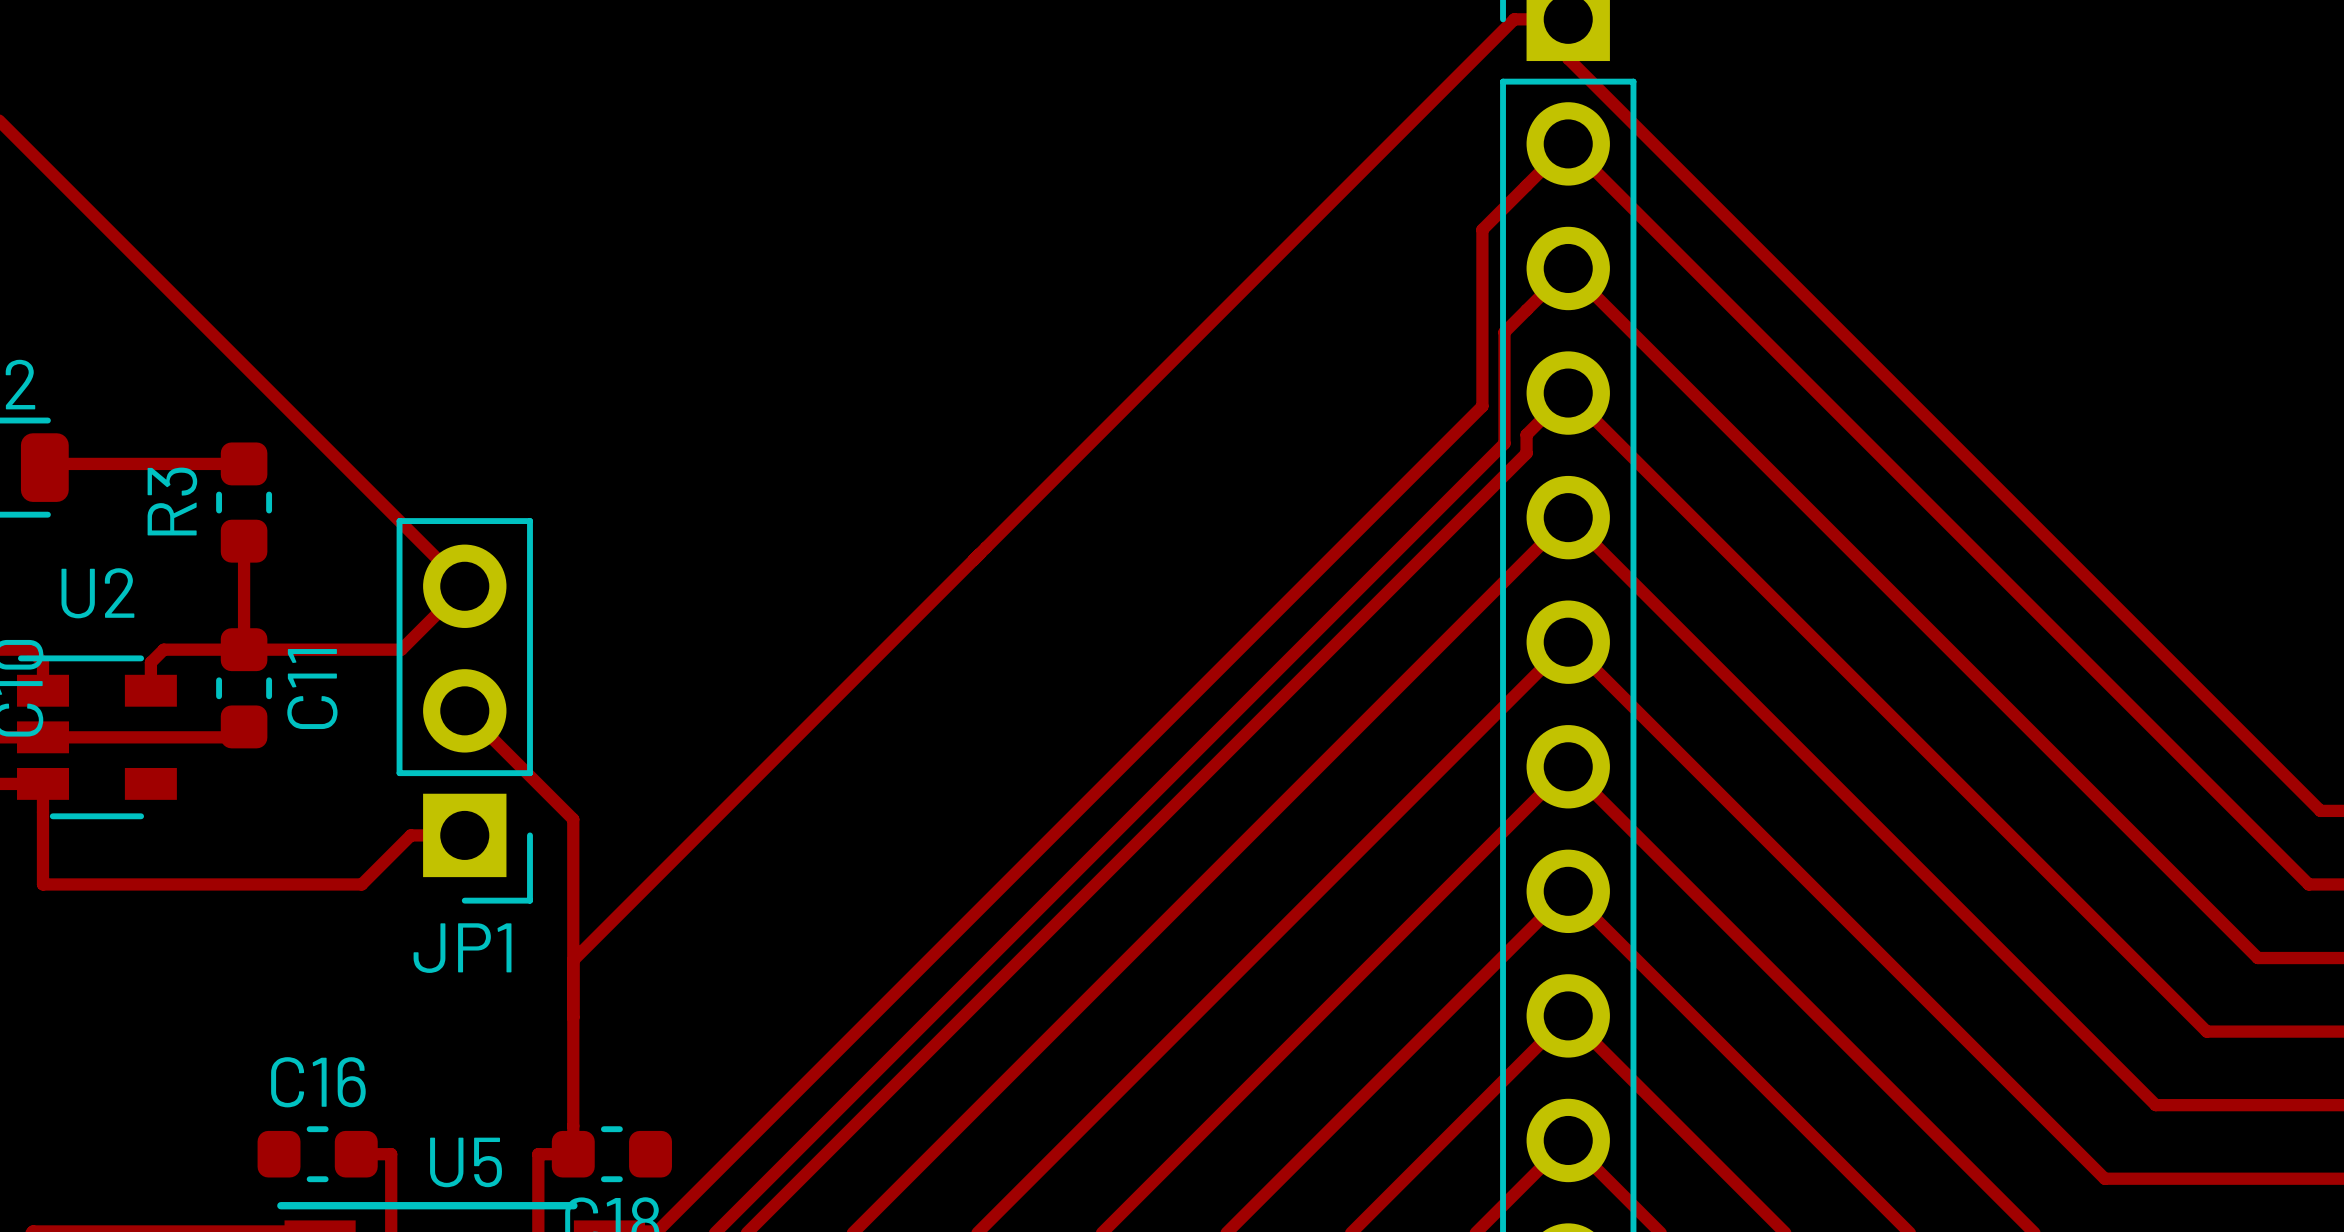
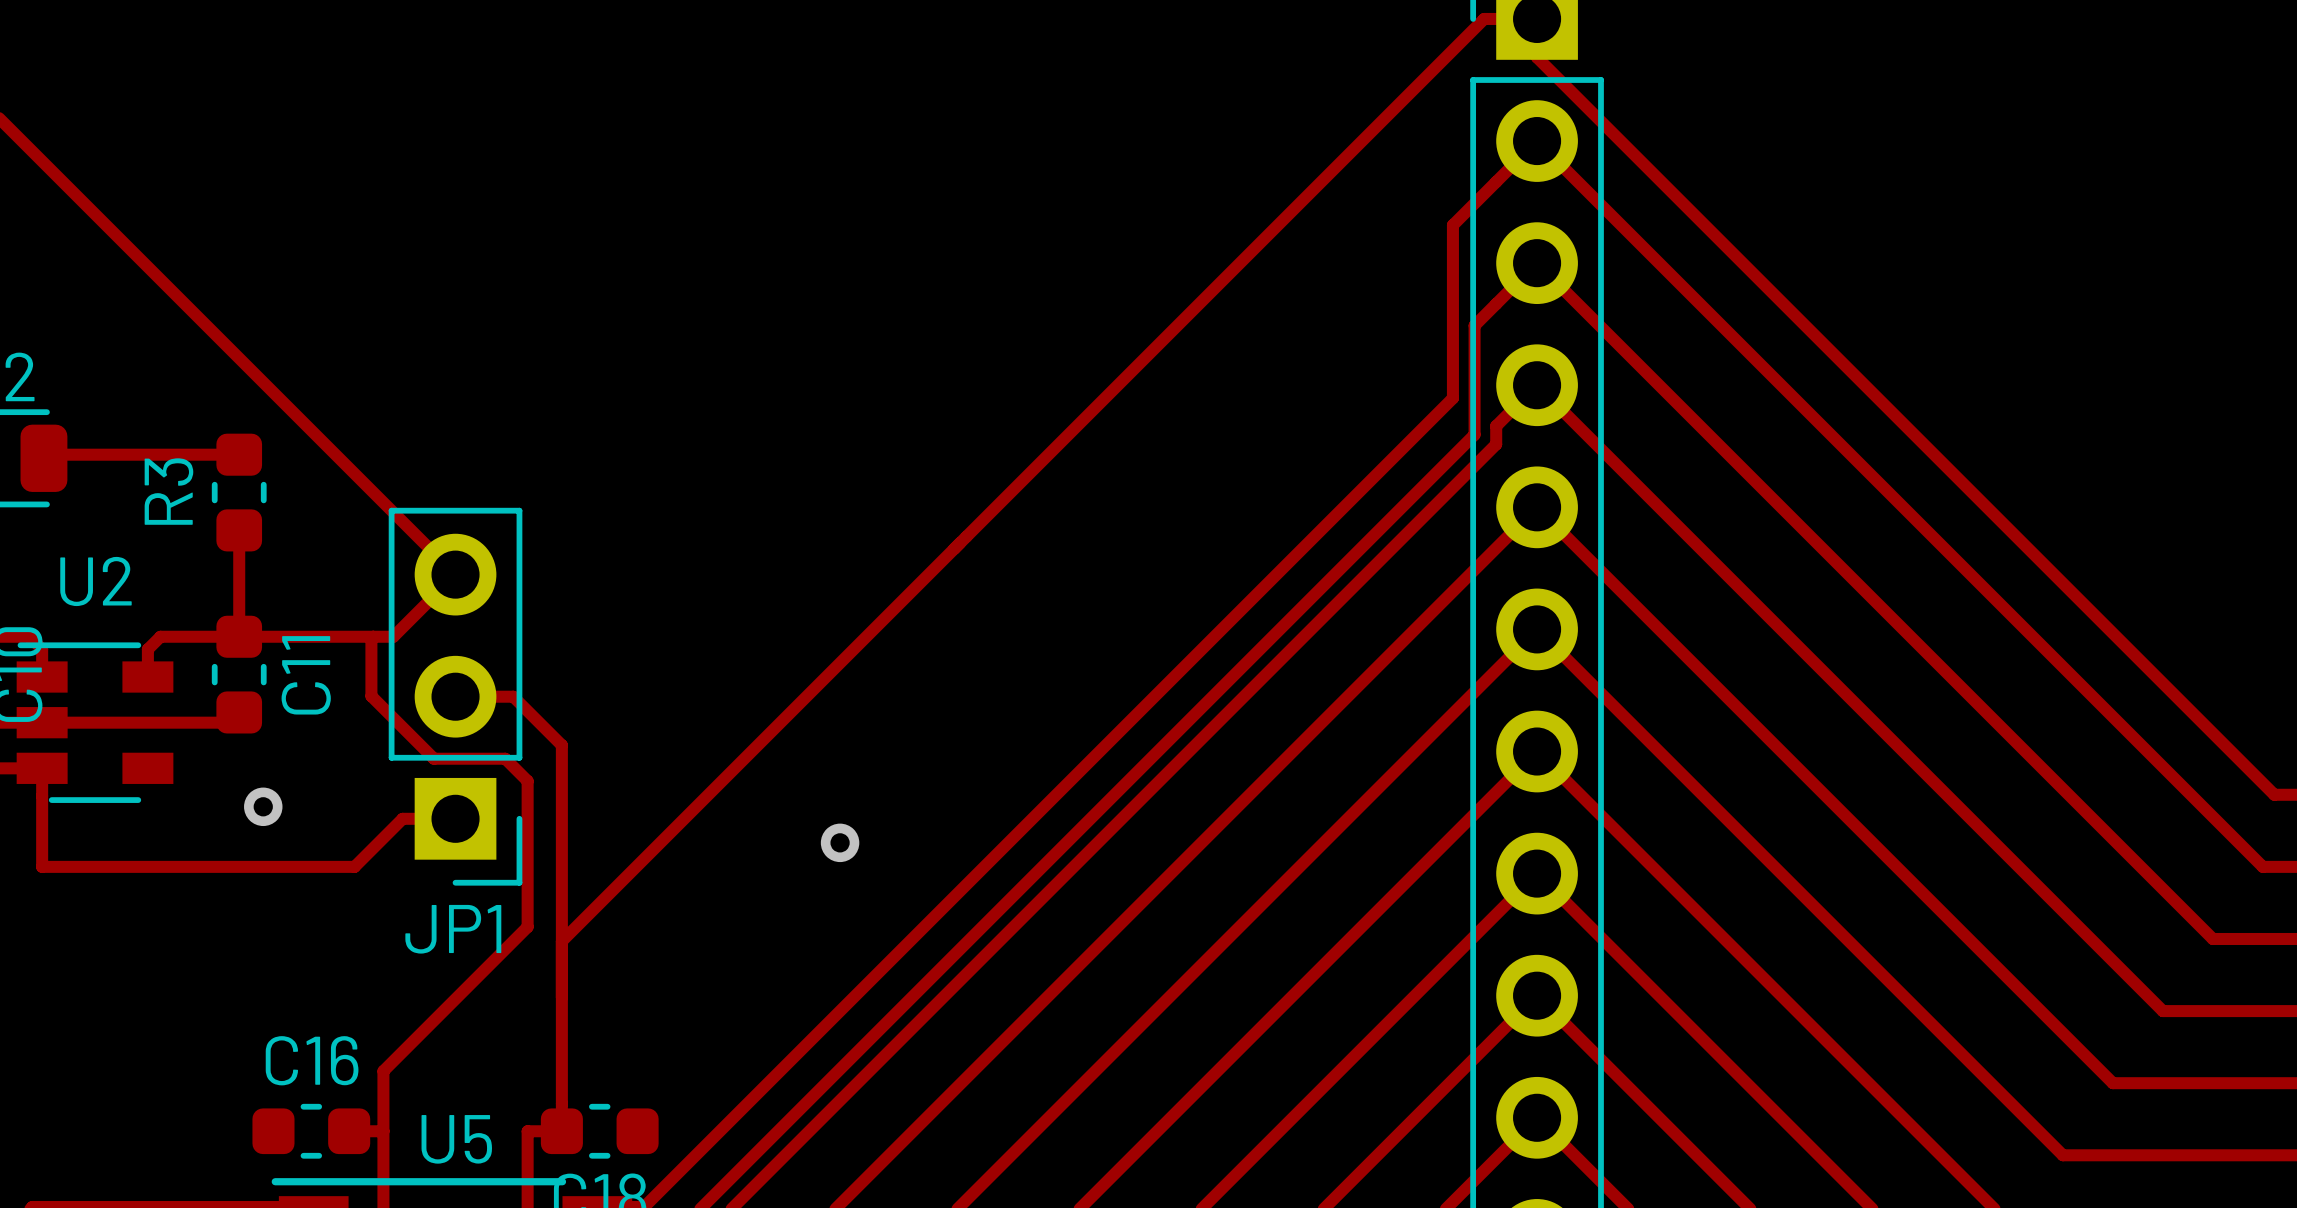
track: none -> (373, 636) (371, 638) (371, 696) (433, 758) (505, 758) (527, 781) (527, 926) (383, 1071) (383, 1131)
track: (464, 710) (573, 819) -> (455, 696) (513, 696) (561, 745) (561, 803)
via: none -> (263, 806)
via: none -> (840, 842)

